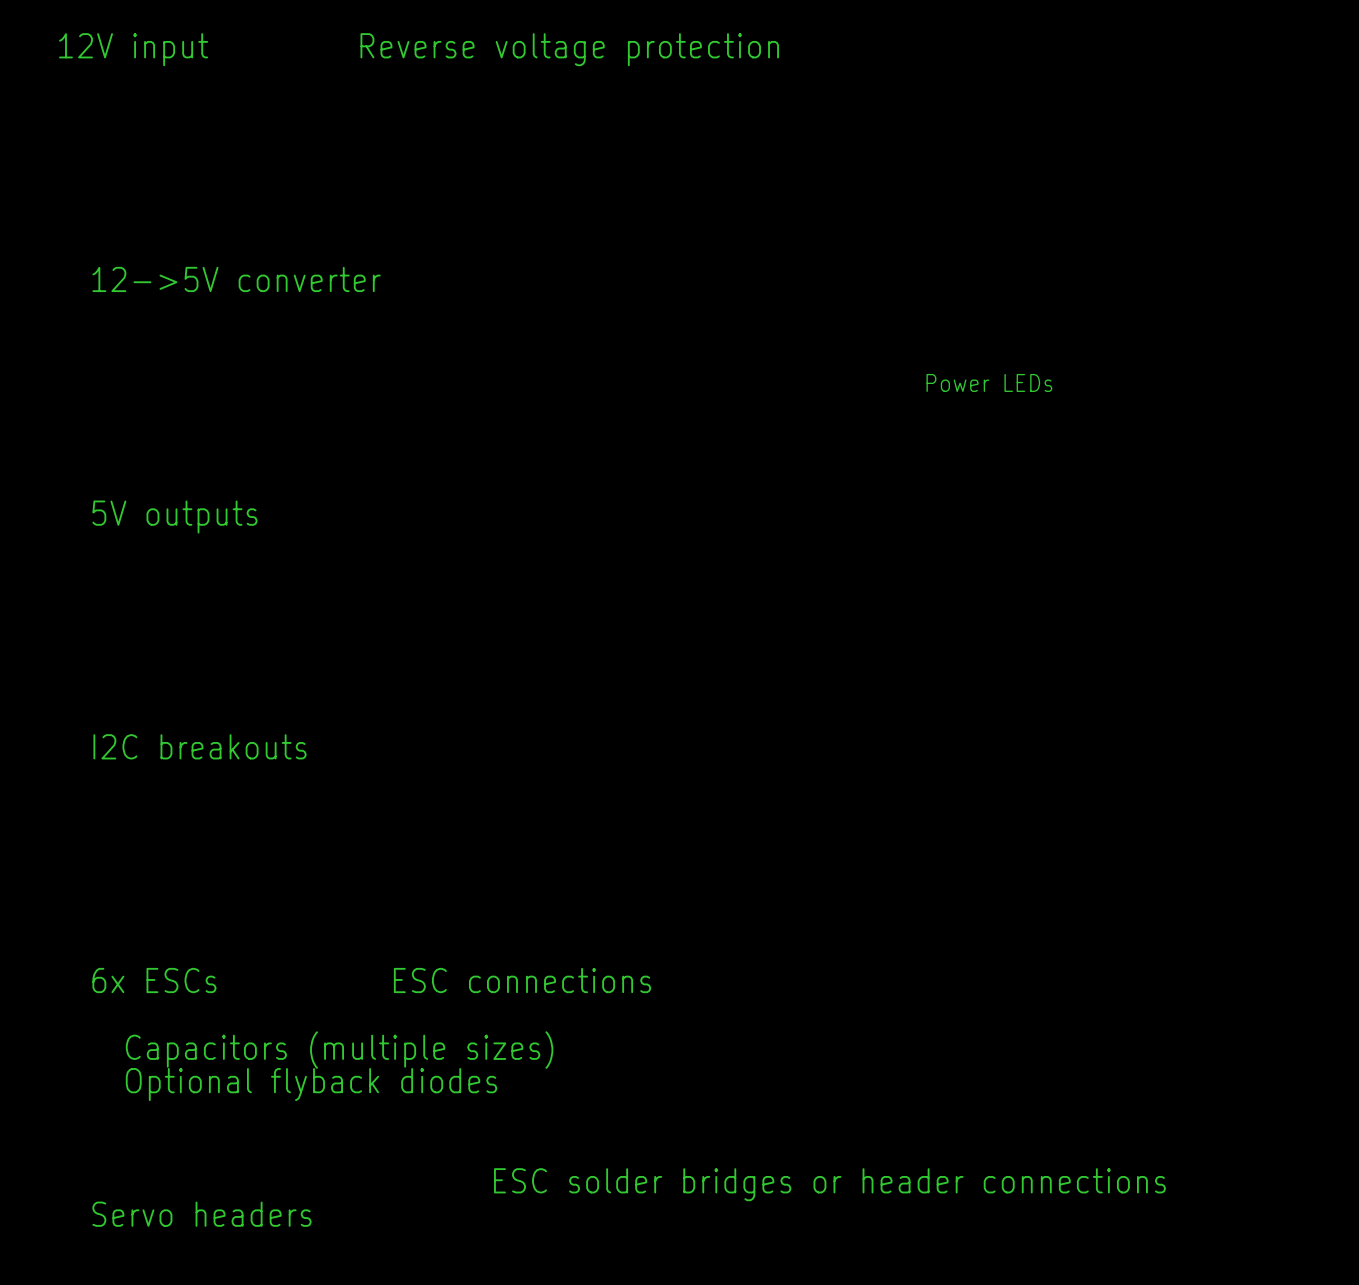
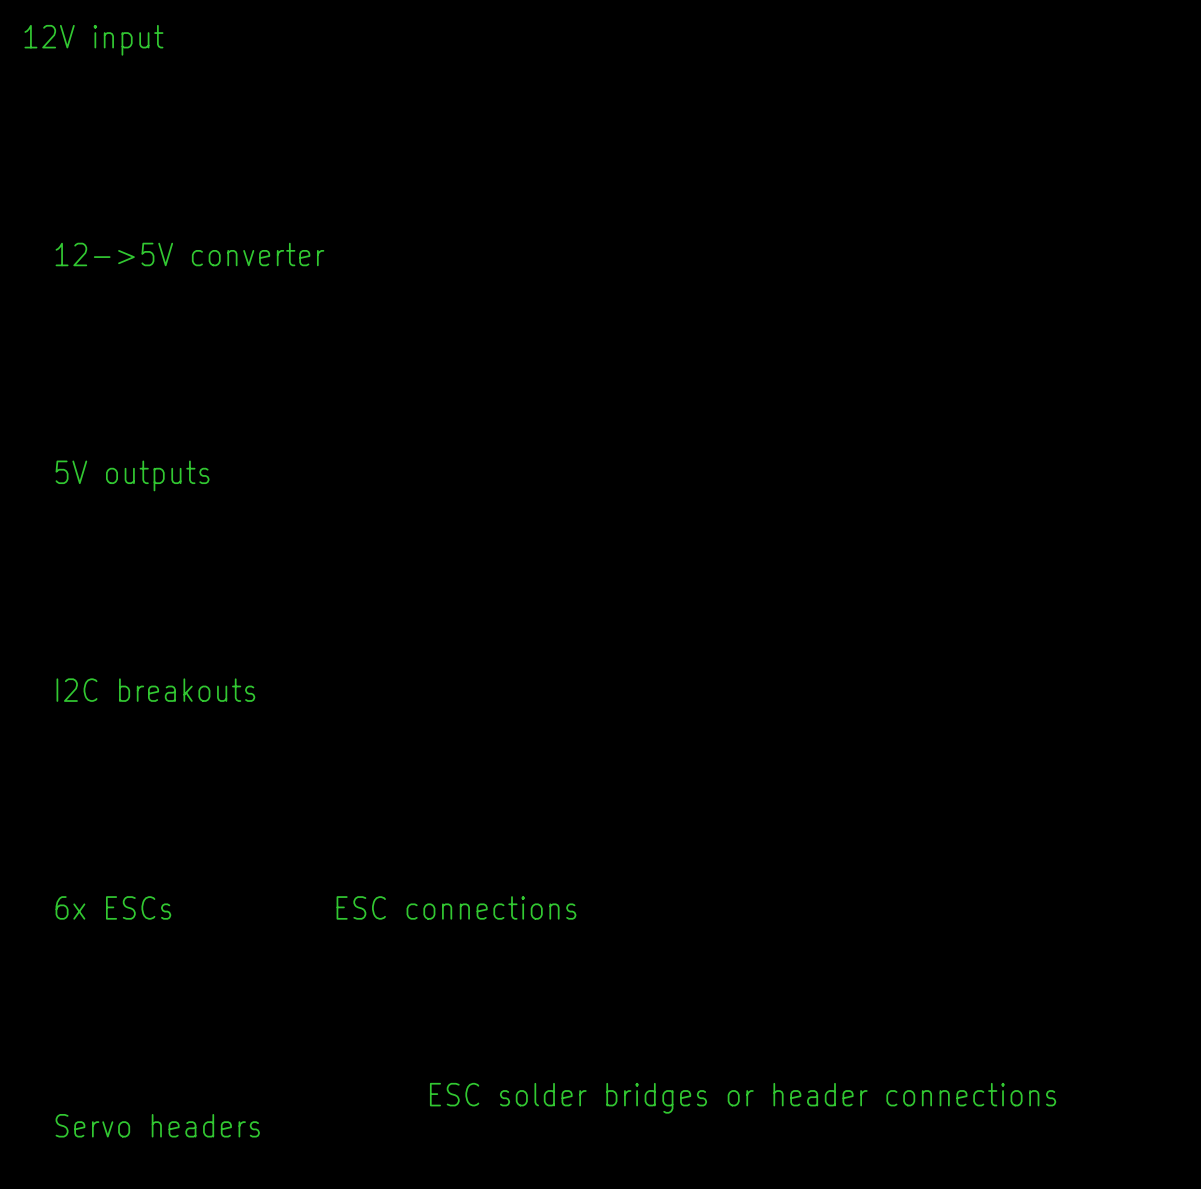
text: Reverse voltage protection (569, 49) -> none
text: Power LEDs (989, 382) -> none
text: Capacitors (multiple sizes) (339, 1050) -> none
text: Optional flyback diodes (311, 1084) -> none

